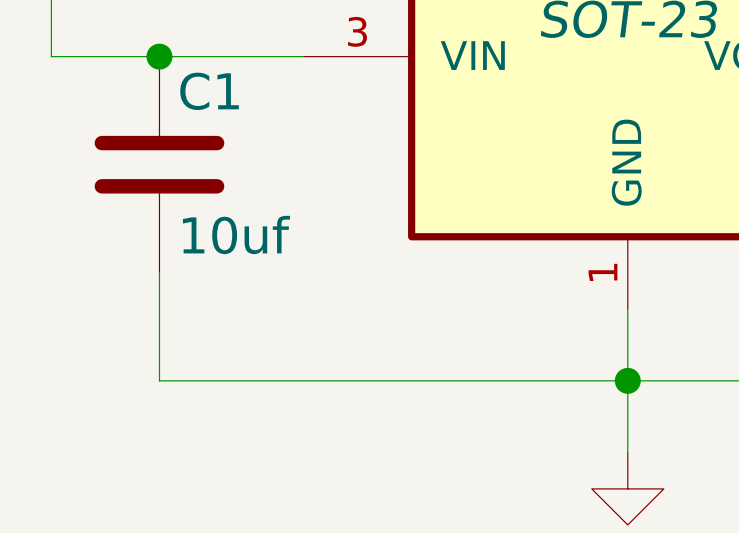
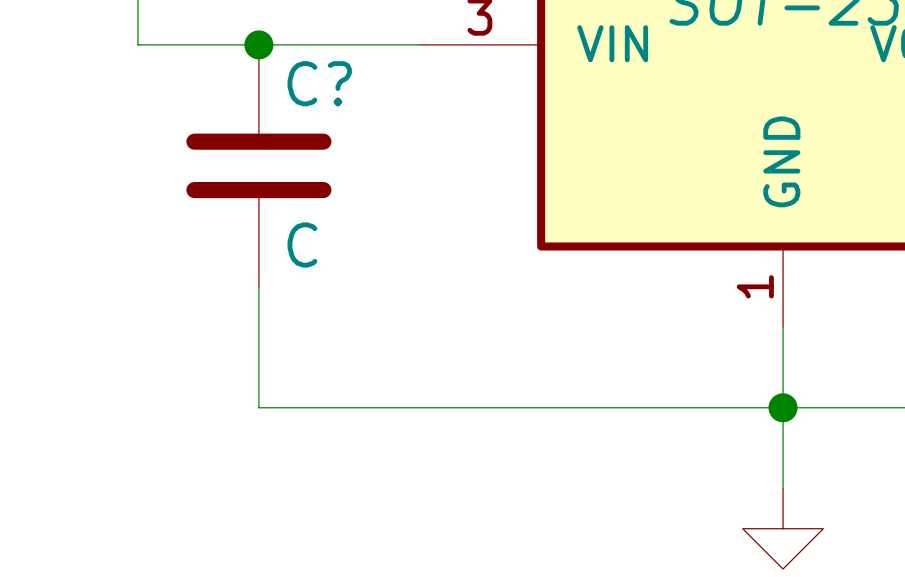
C1 name: C1 (209, 91) -> C? (319, 83)
C1 value: 10uf (236, 234) -> C (302, 244)

